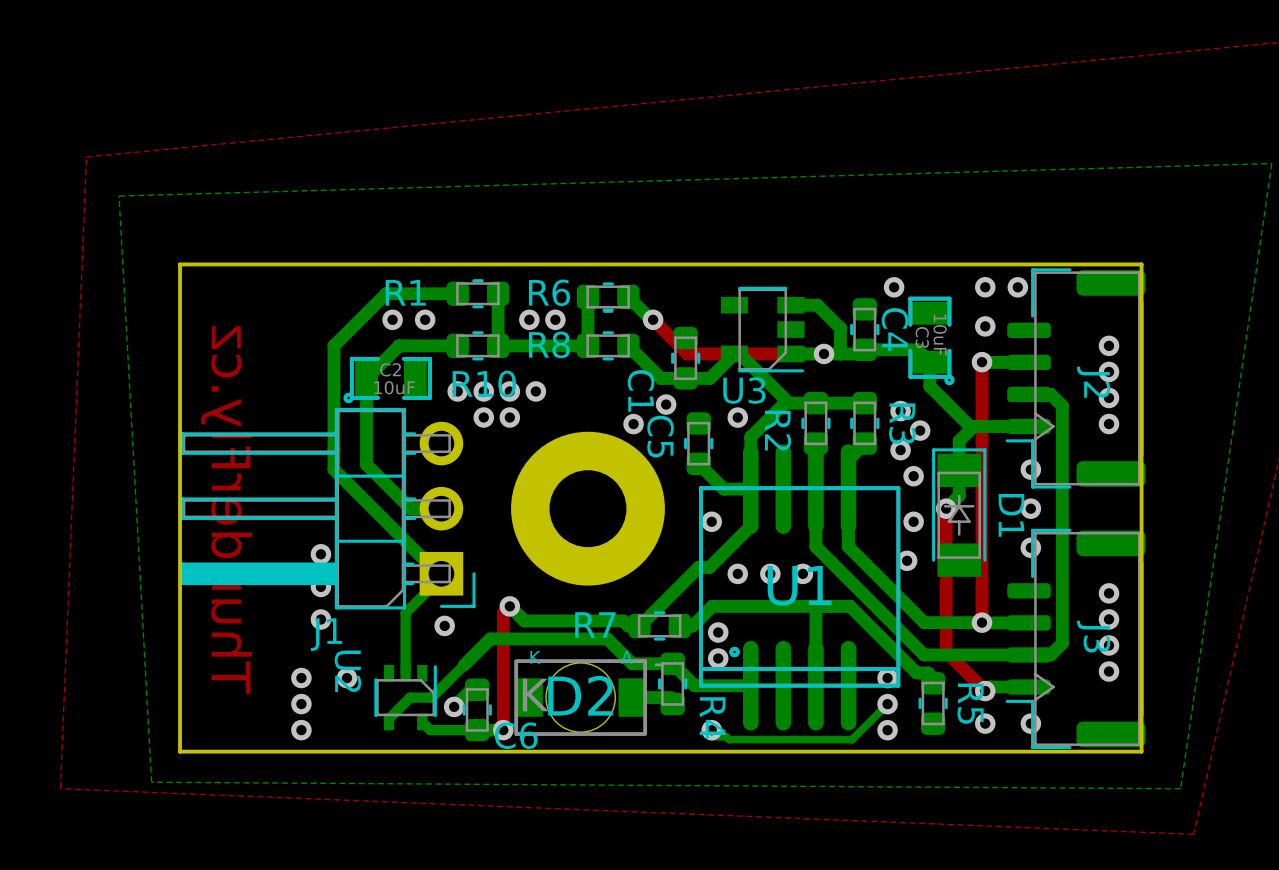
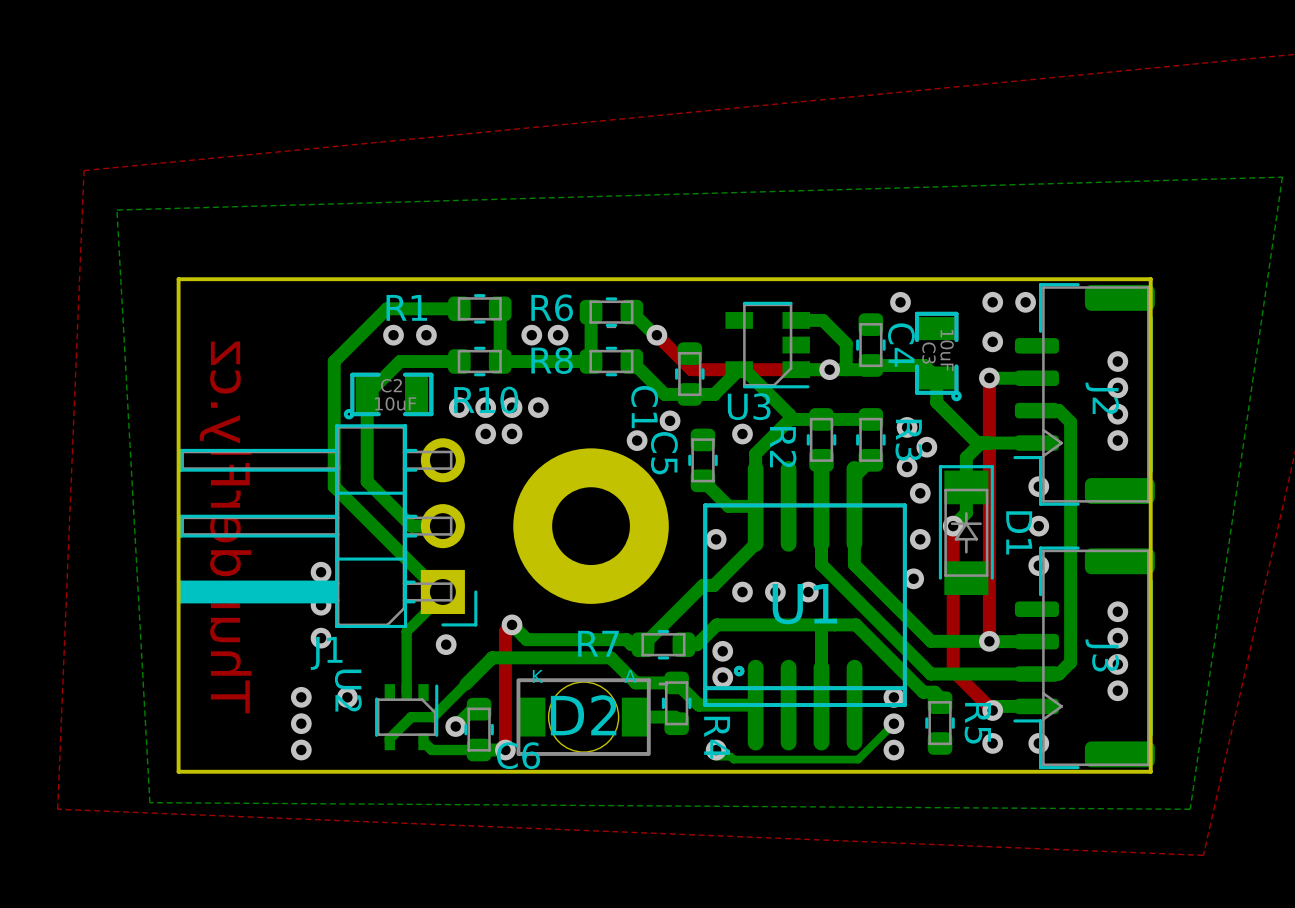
D2 text: K (535, 695) -> none

